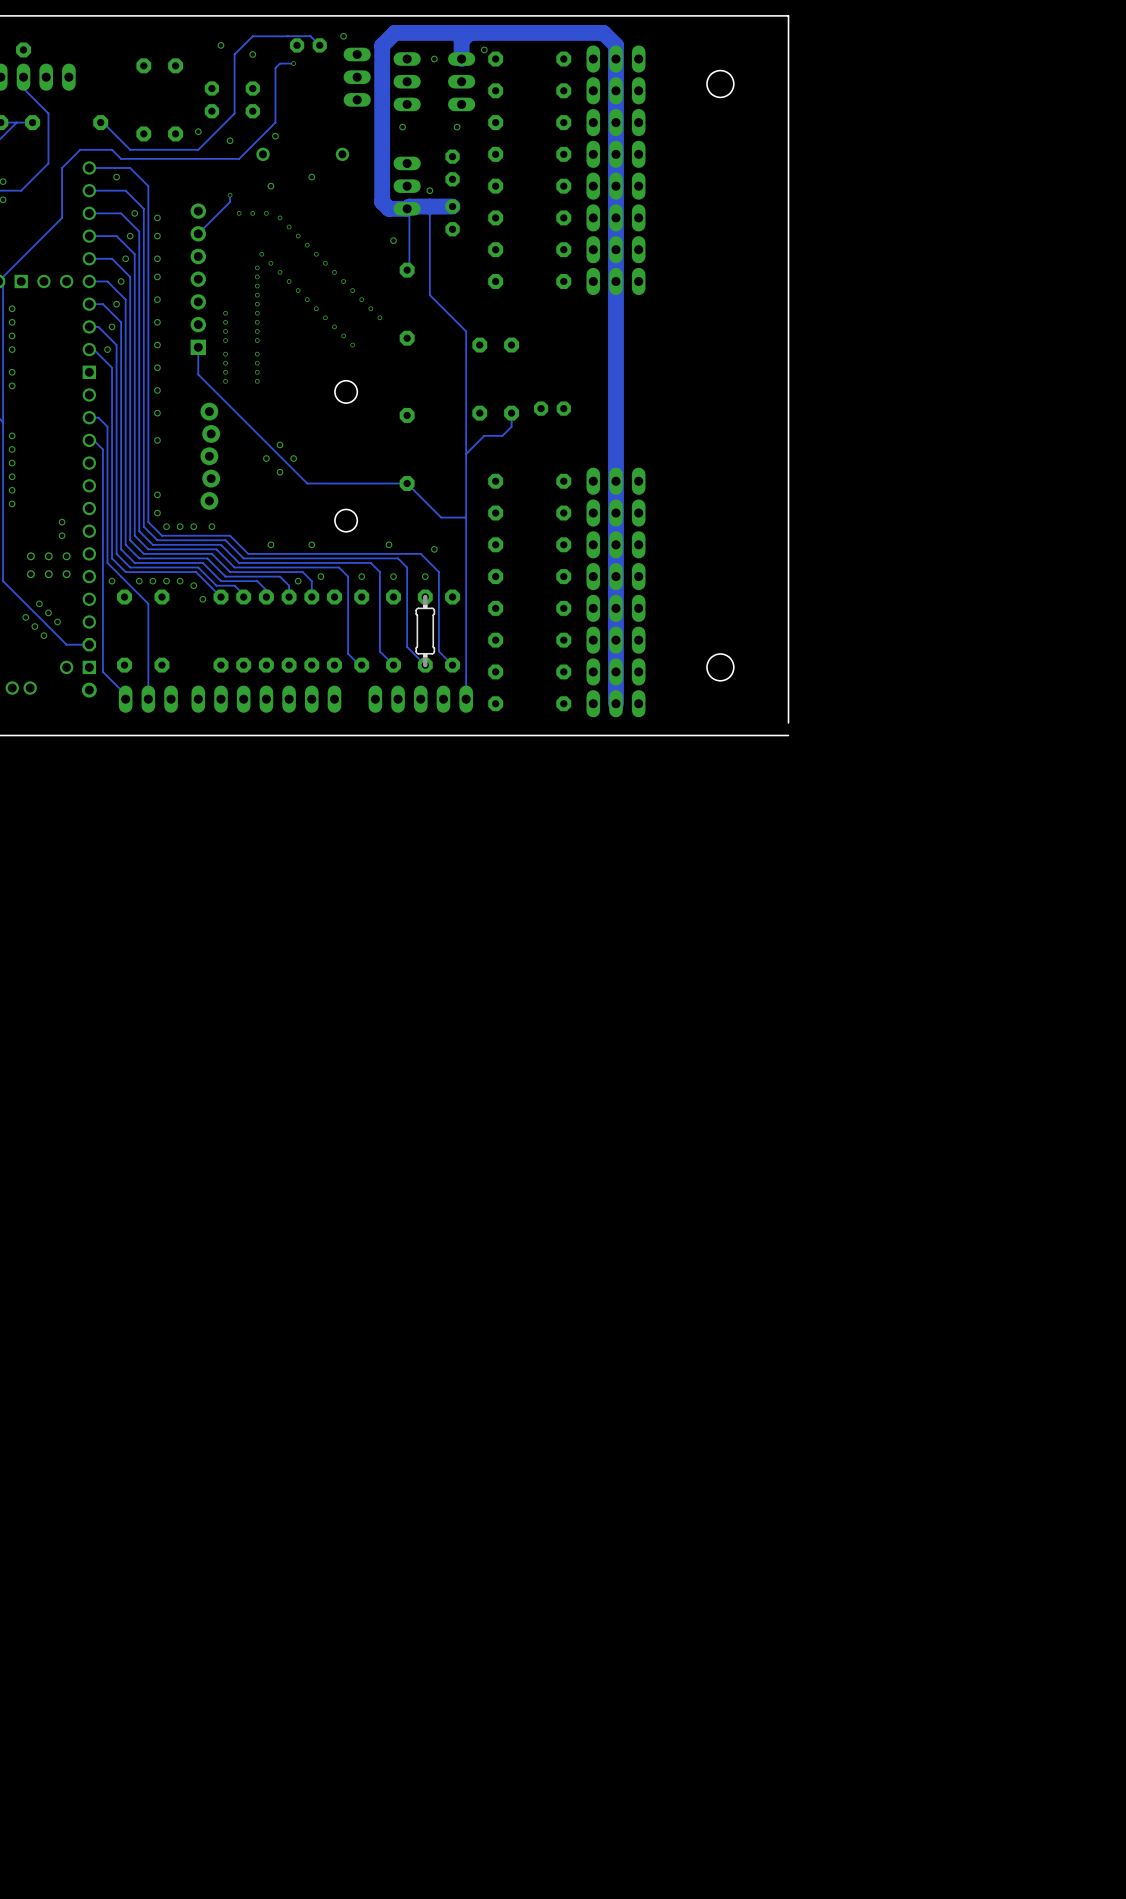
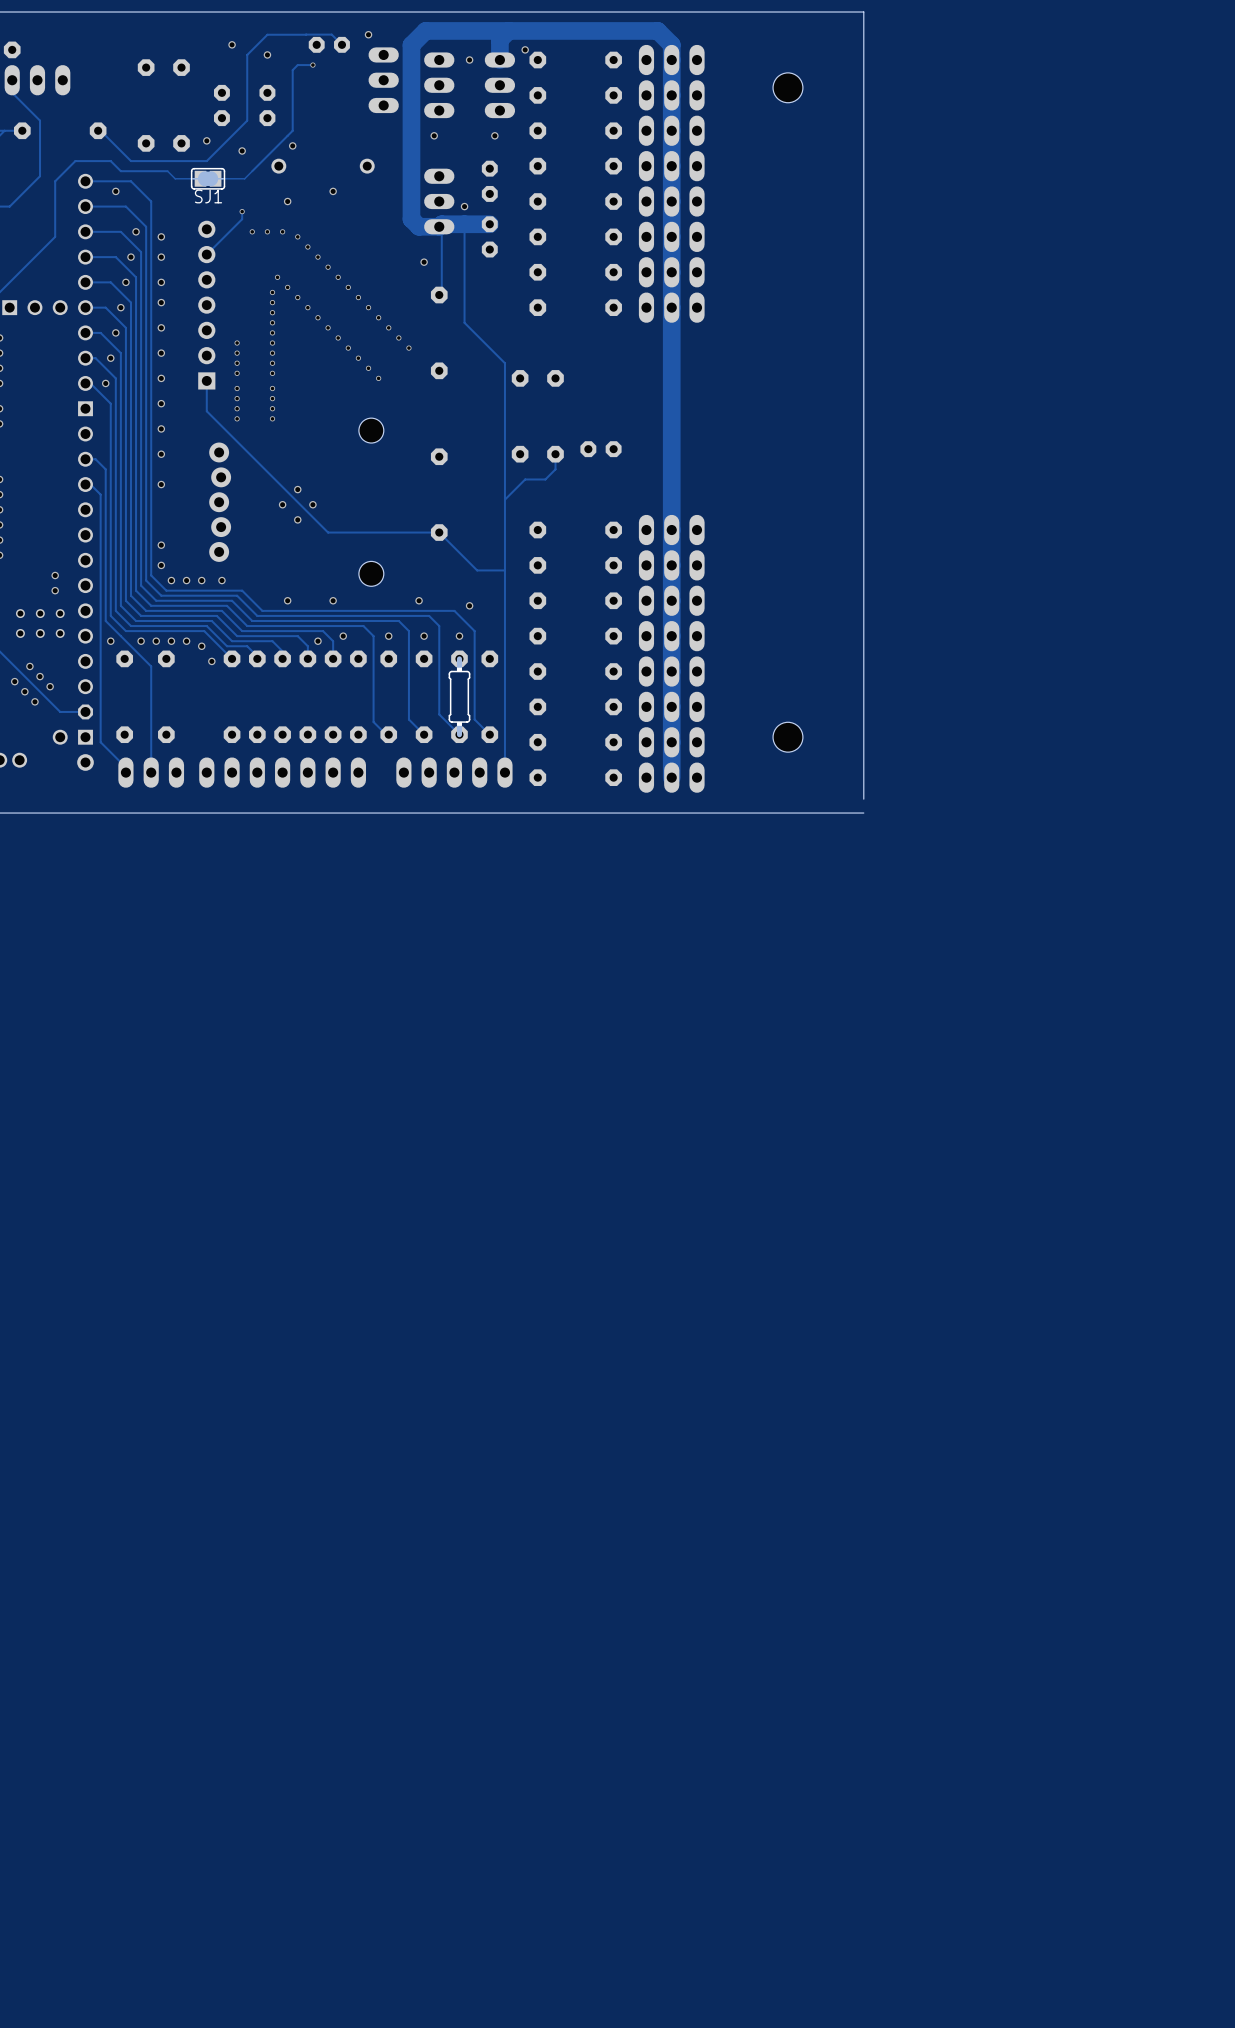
track: none -> (167, 171) (175, 178) (200, 178)
track: (239, 158) (163, 158) -> (252, 171) (244, 178) (215, 178)
SJ1: none -> (208, 178)

